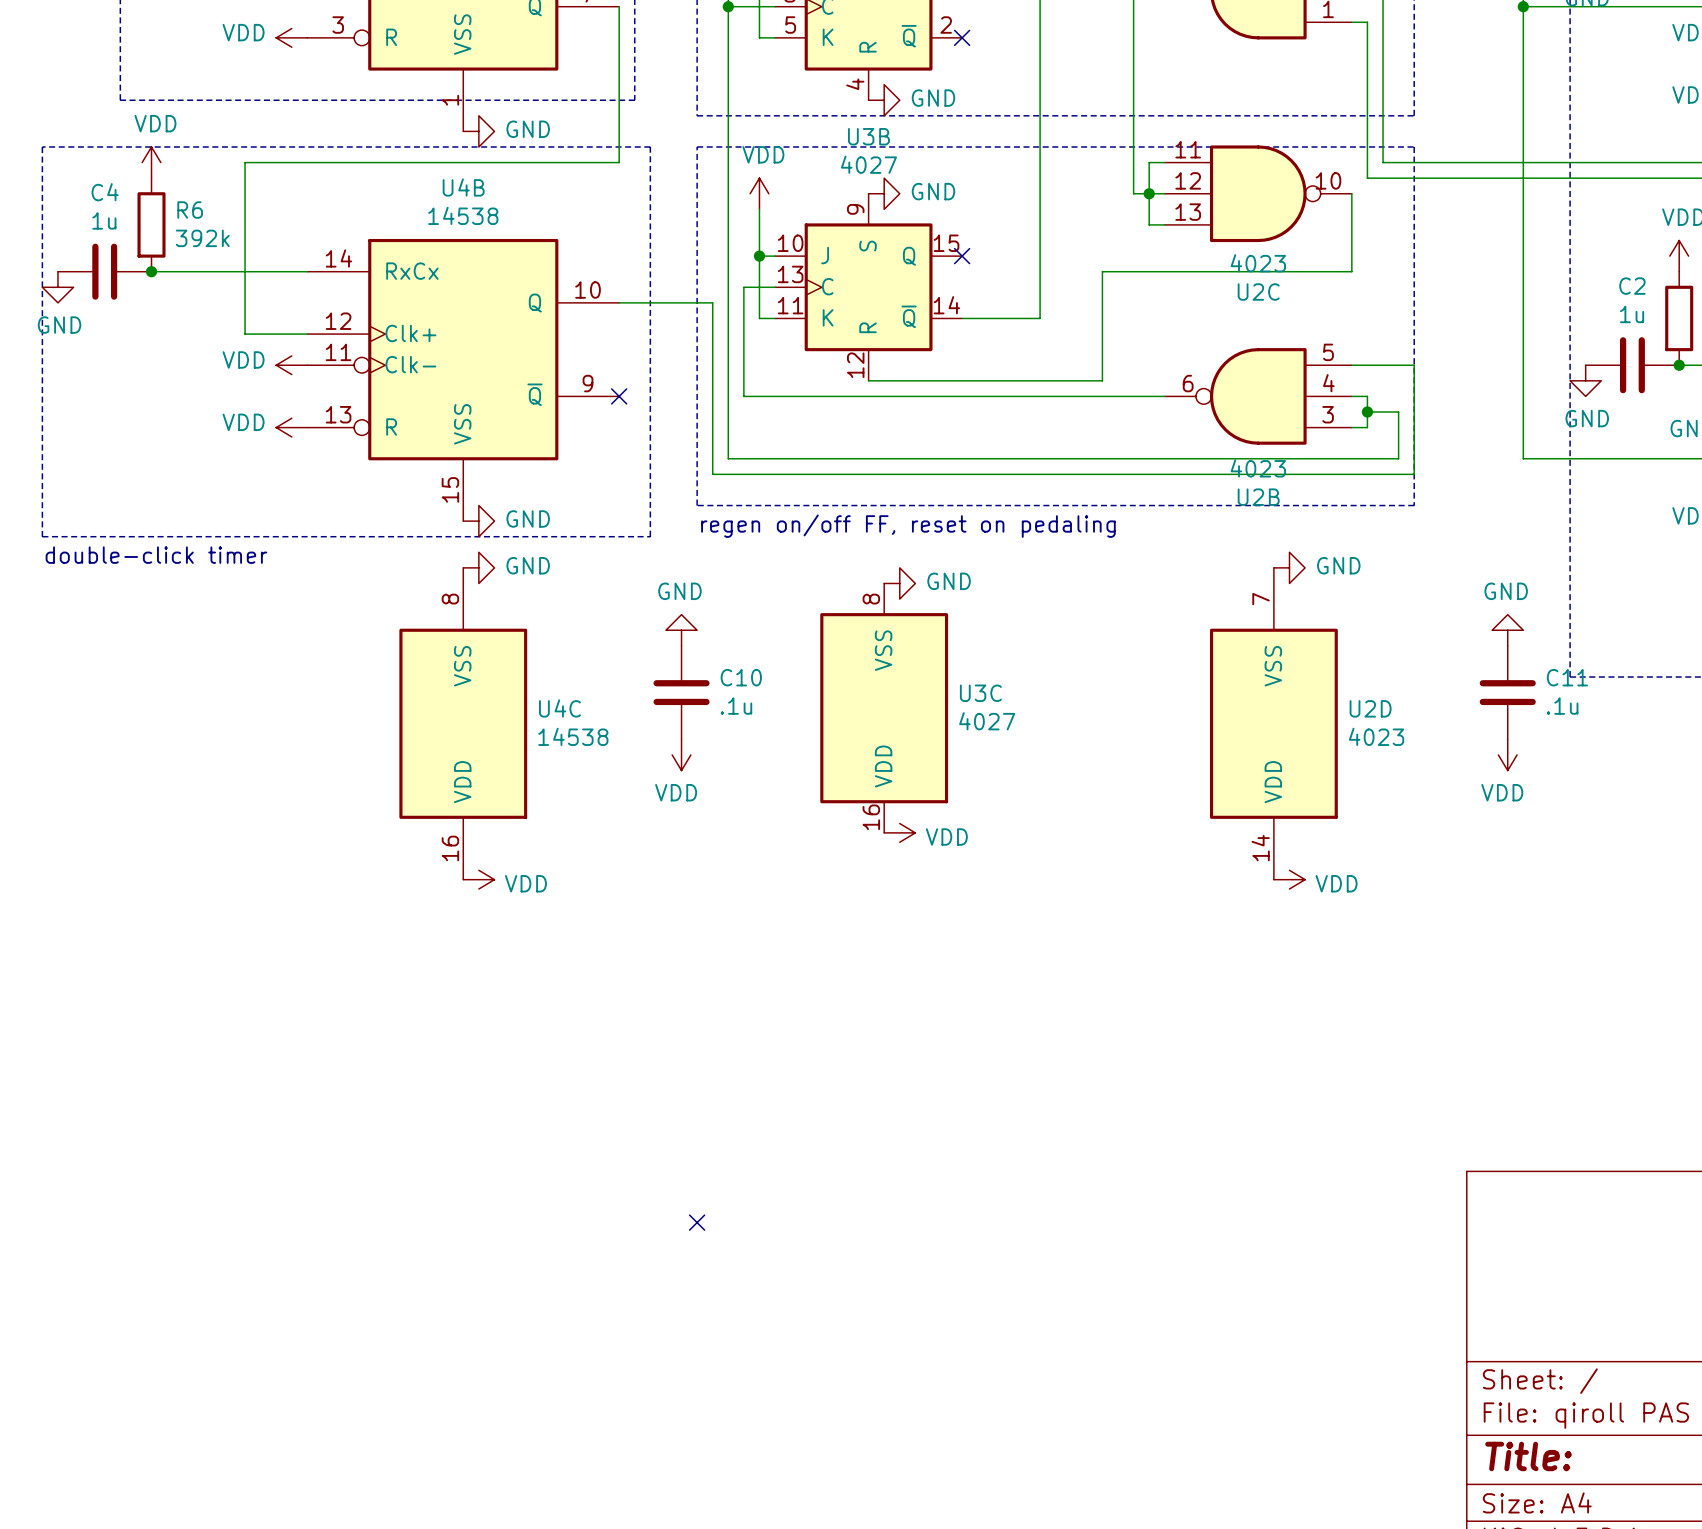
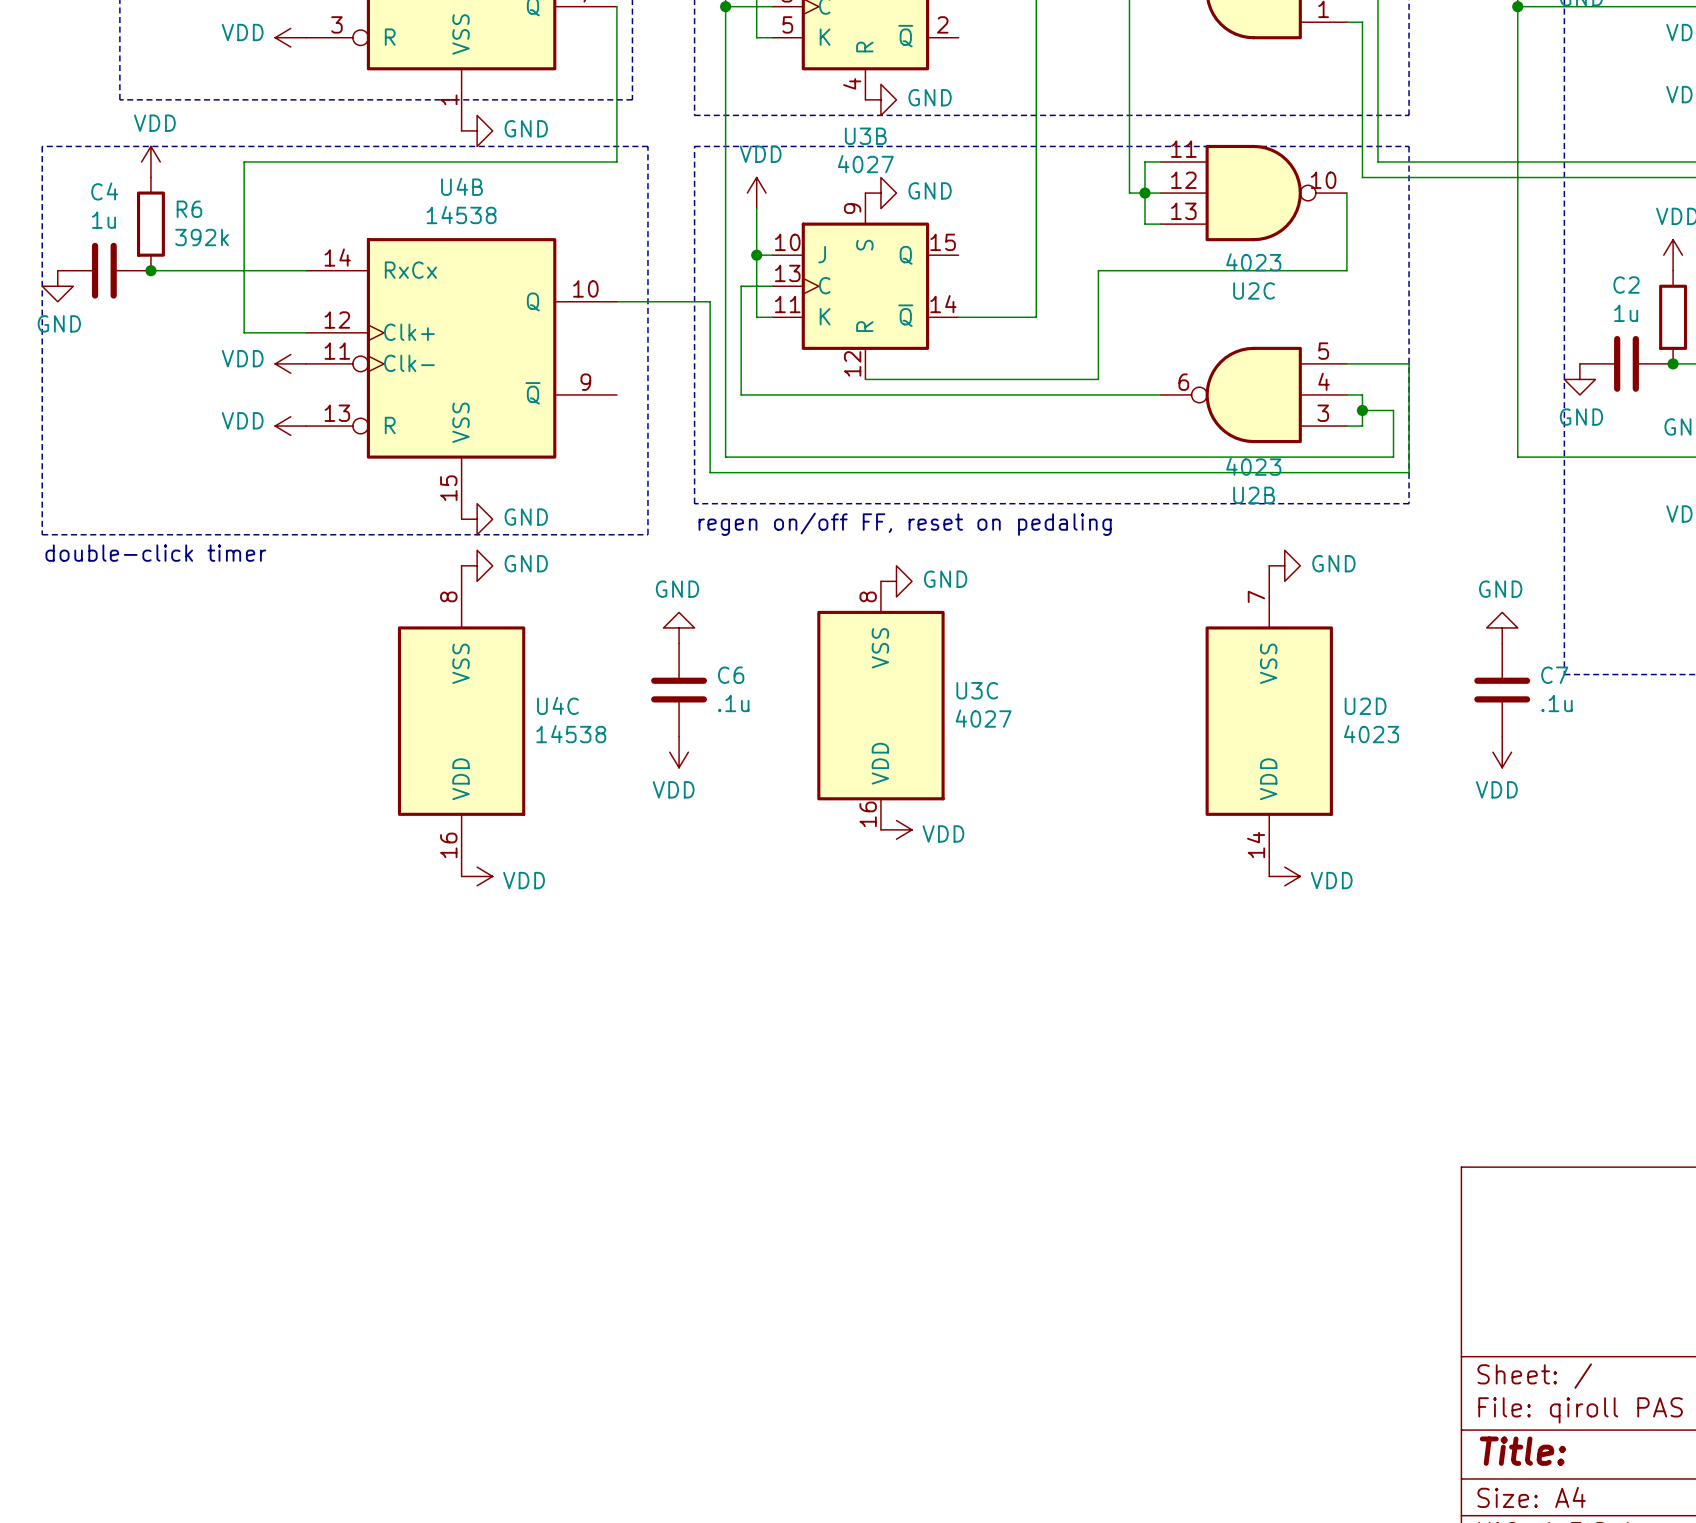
no-connect mark: (962, 37) -> none
no-connect mark: (962, 256) -> none
no-connect mark: (619, 396) -> none
C10 name: C10 (741, 677) -> C6 (731, 675)
C11 name: C11 (1567, 677) -> C7 (1554, 675)
no-connect mark: (697, 1222) -> none

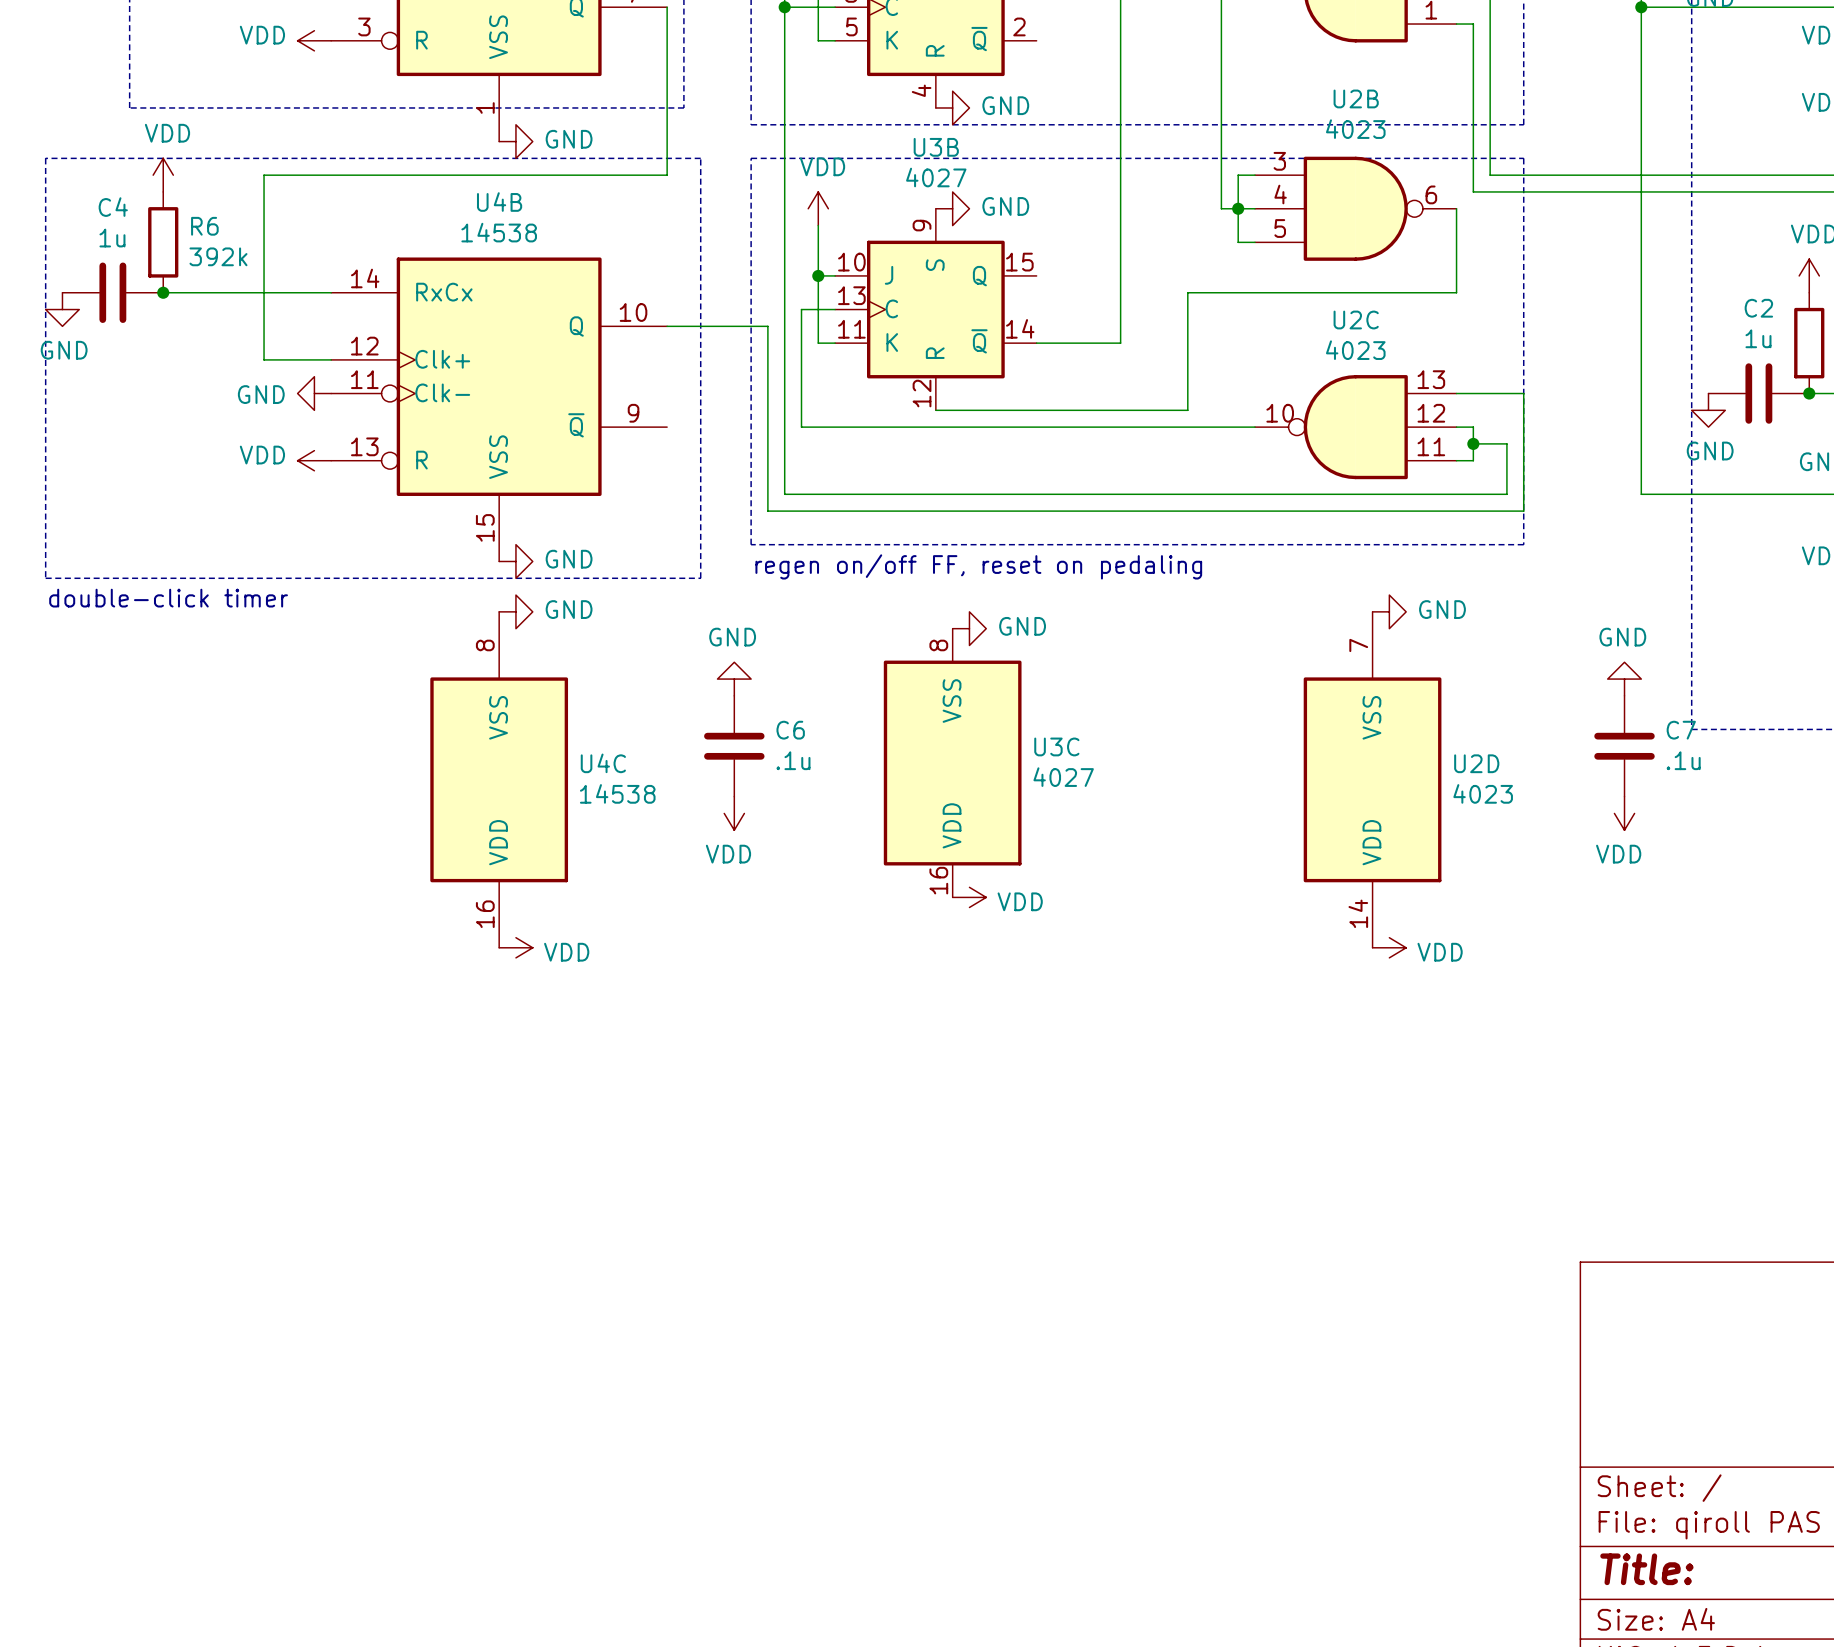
U2C rotation: 0° (1253, 193) -> 180° (1355, 427)
U2C position: (1253, 193) -> (1355, 427)
power symbol: VDD (290, 363) -> GND (314, 393)
U2B rotation: 0° (1253, 394) -> 180° (1355, 208)
U2B position: (1253, 394) -> (1355, 208)

